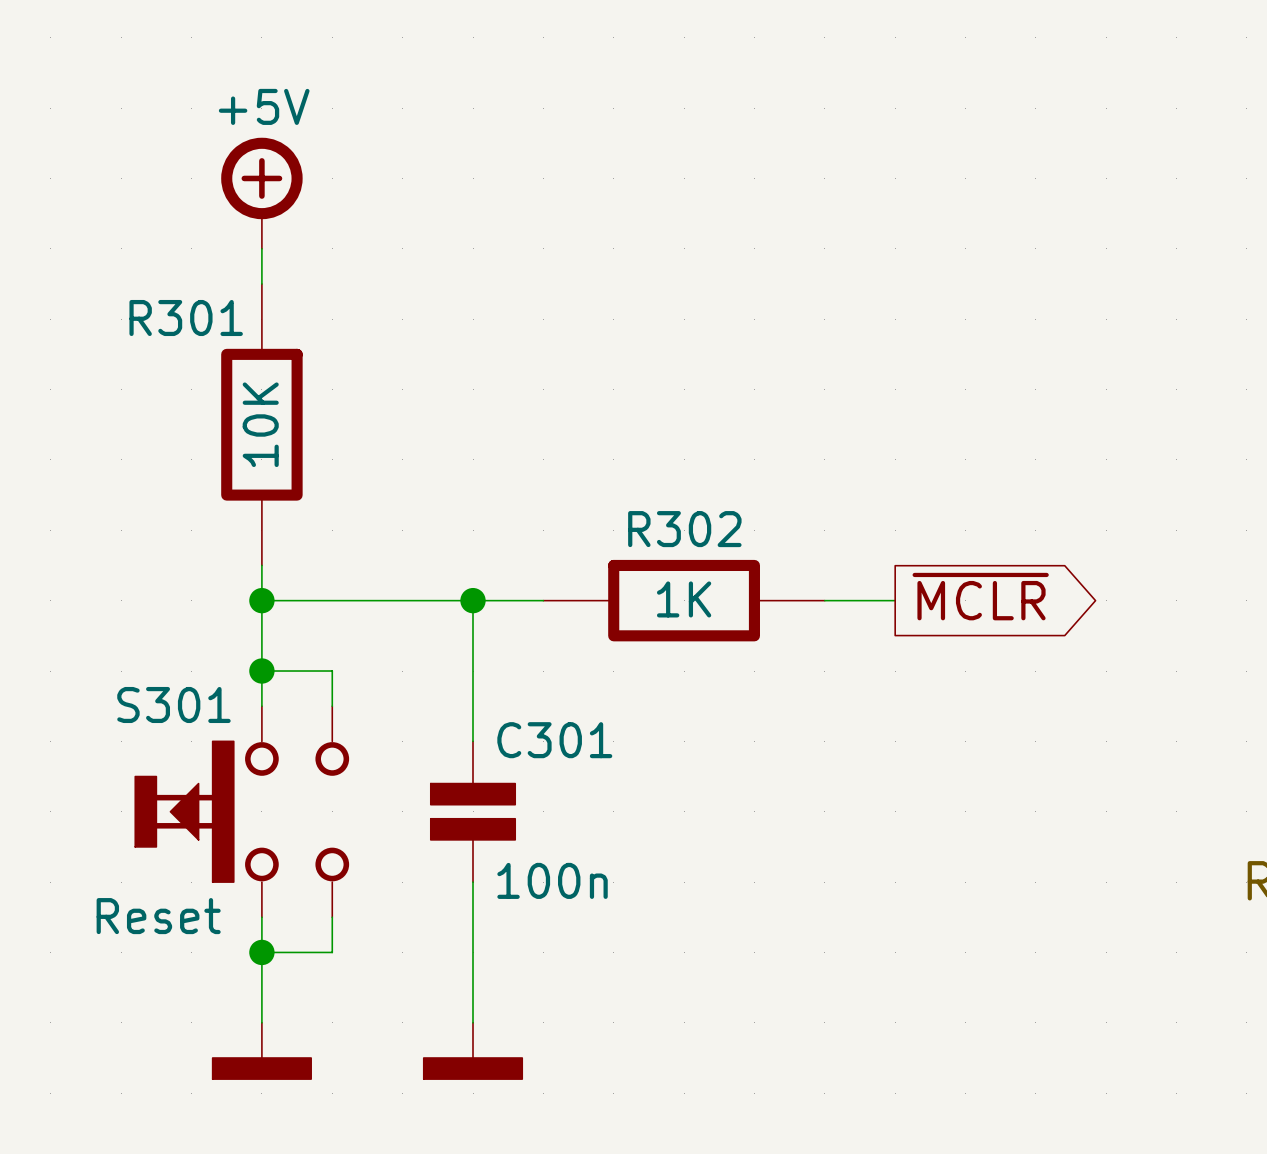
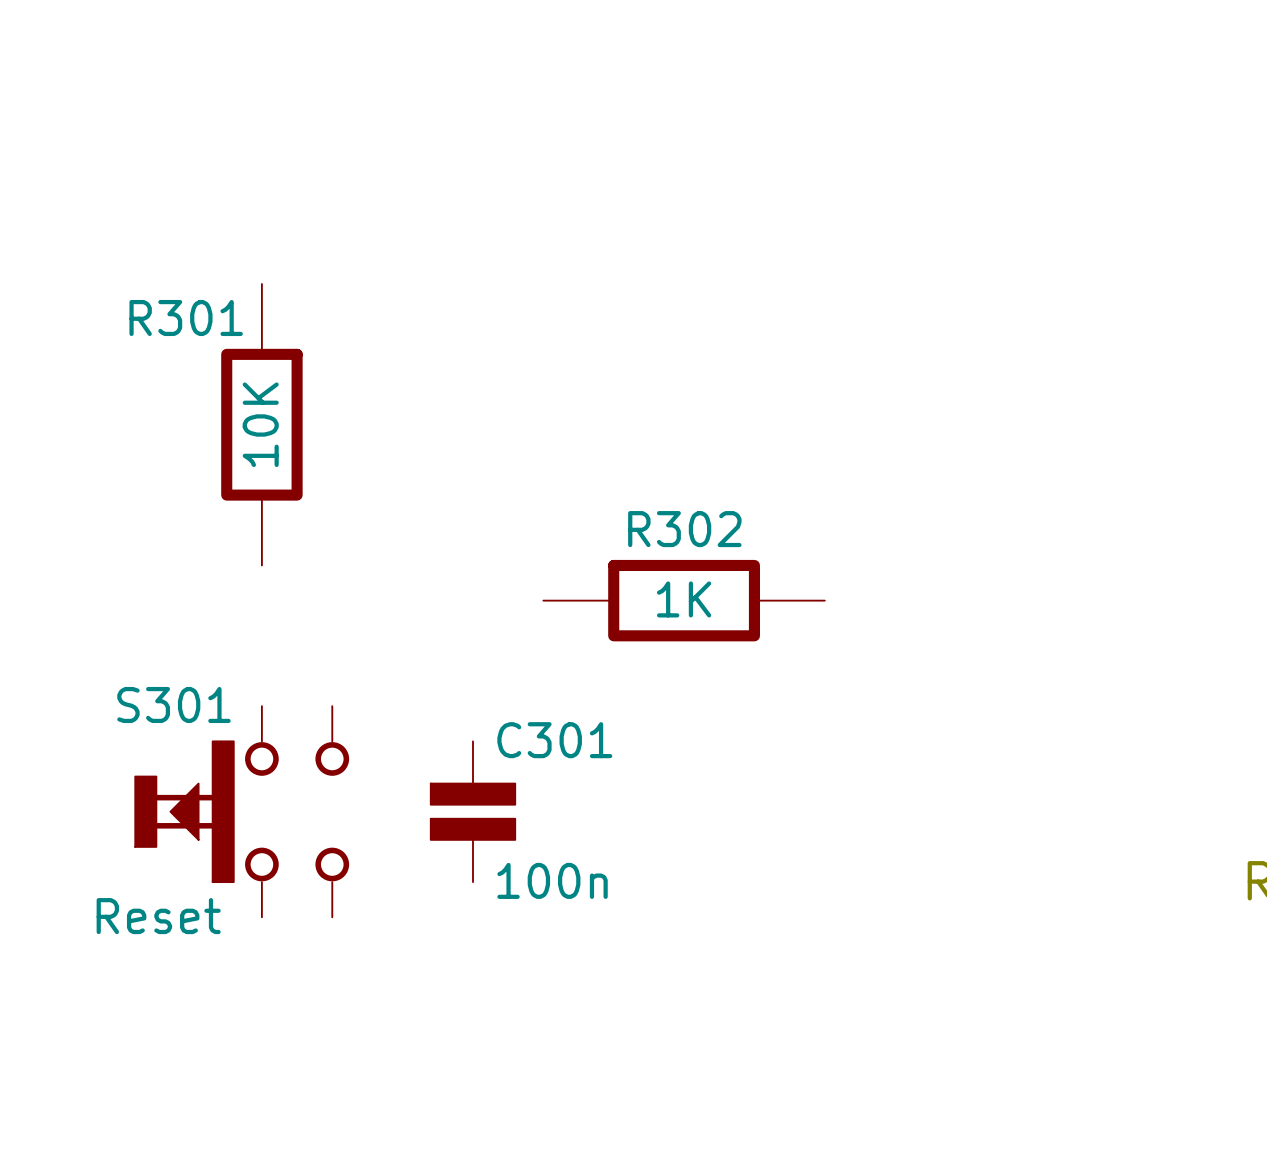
power symbol: (261, 193) -> none
wire: (261, 248) (261, 284) -> none
wire: (261, 565) (261, 706) -> none
global label: ~{MCLR} (980, 596) -> none
wire: (261, 600) (543, 600) -> none
junction: (261, 600) -> none
wire: (473, 600) (473, 741) -> none
junction: (473, 600) -> none
wire: (824, 600) (895, 600) -> none
wire: (261, 671) (332, 671) (332, 706) -> none
junction: (261, 671) -> none
wire: (473, 882) (473, 1022) -> none
wire: (261, 917) (261, 1022) -> none
wire: (332, 917) (332, 952) (261, 952) -> none
junction: (261, 952) -> none
power symbol: (261, 1050) -> none
power symbol: (473, 1050) -> none

